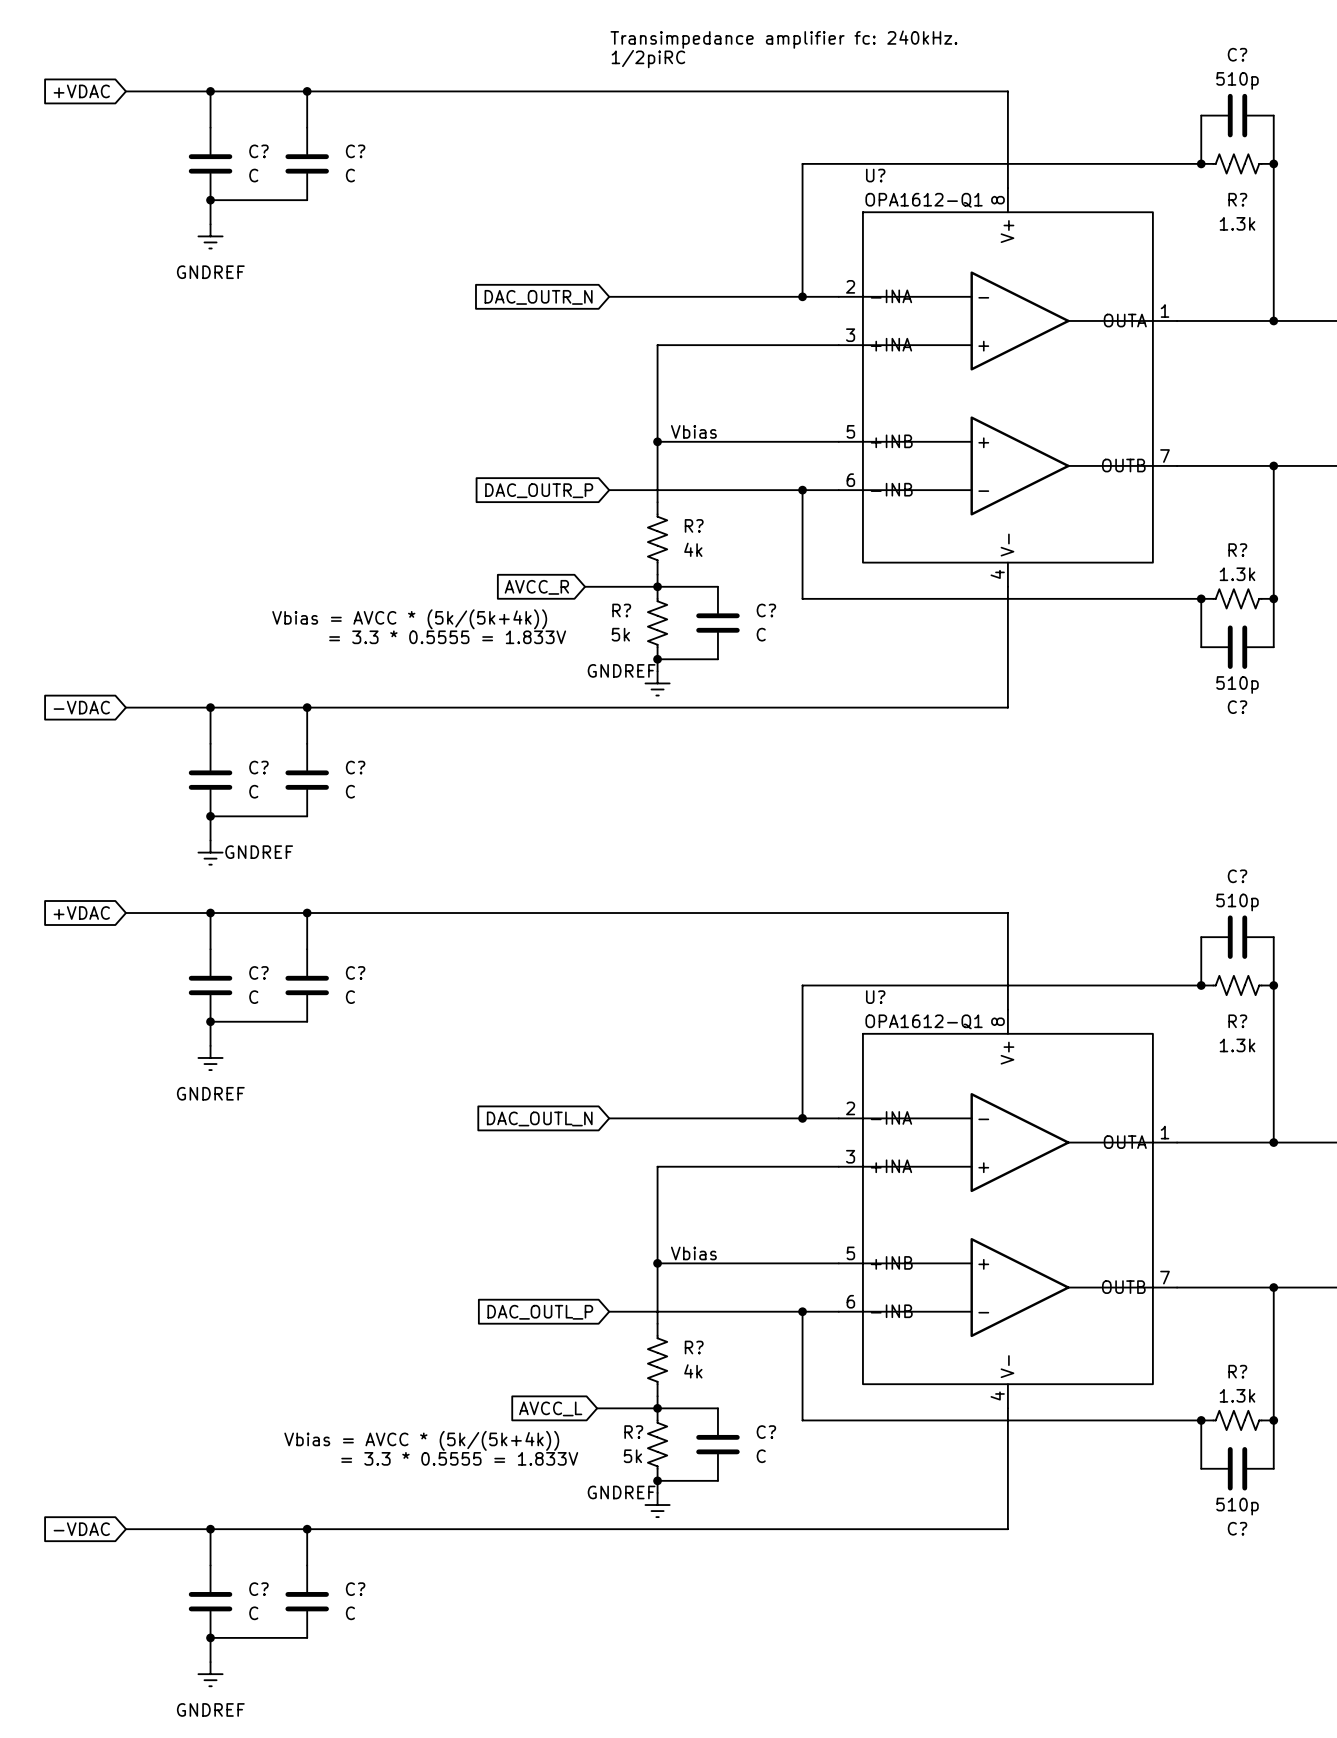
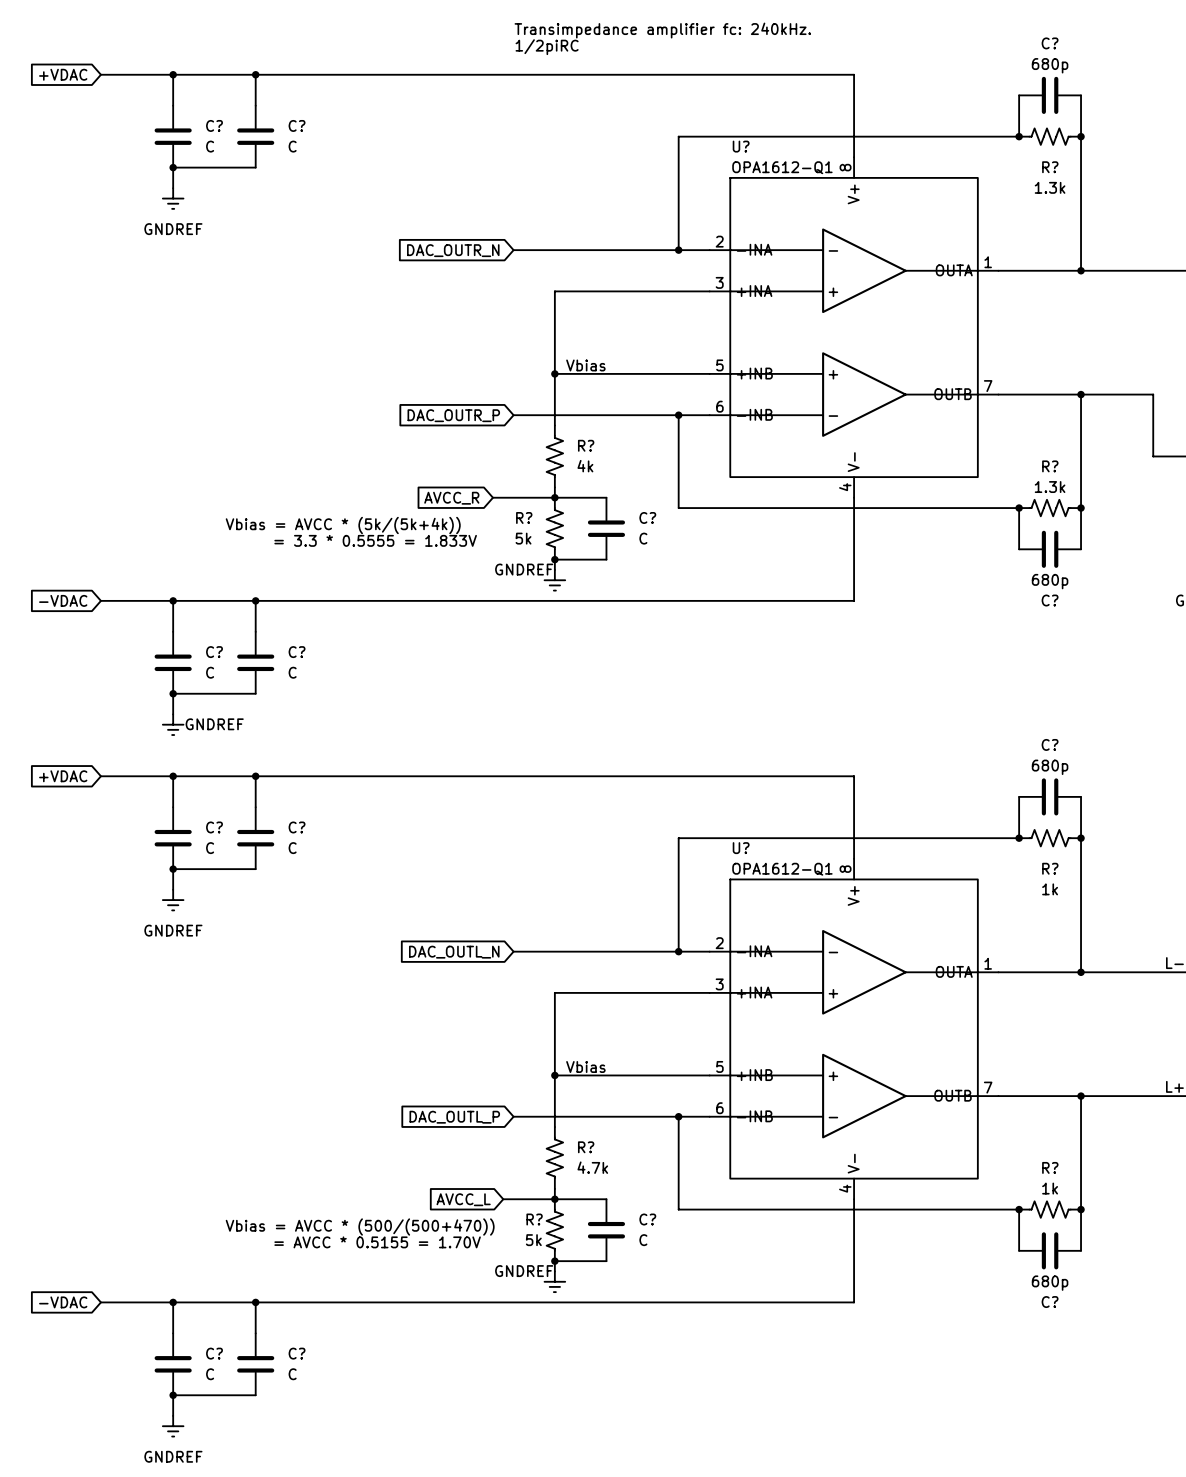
C? value: 510p (1237, 80) -> 680p (1050, 65)
C? value: 510p (1237, 685) -> 680p (1050, 581)
C? value: 510p (1237, 902) -> 680p (1050, 767)
R? value: 1.3k (1237, 1045) -> 1k (1050, 889)
R? value: 4k (693, 1371) -> 4.7k (592, 1167)
R? value: 1.3k (1237, 1395) -> 1k (1050, 1188)
text: Vbias = AVCC * (5k/(5k+4k)) (421, 1440) -> Vbias = AVCC * (500/(500+470)) (360, 1227)
text: = 3.3 * 0.5555 = 1.833V (459, 1458) -> = AVCC * 0.5155 = 1.70V (377, 1242)
C? value: 510p (1237, 1506) -> 680p (1050, 1283)

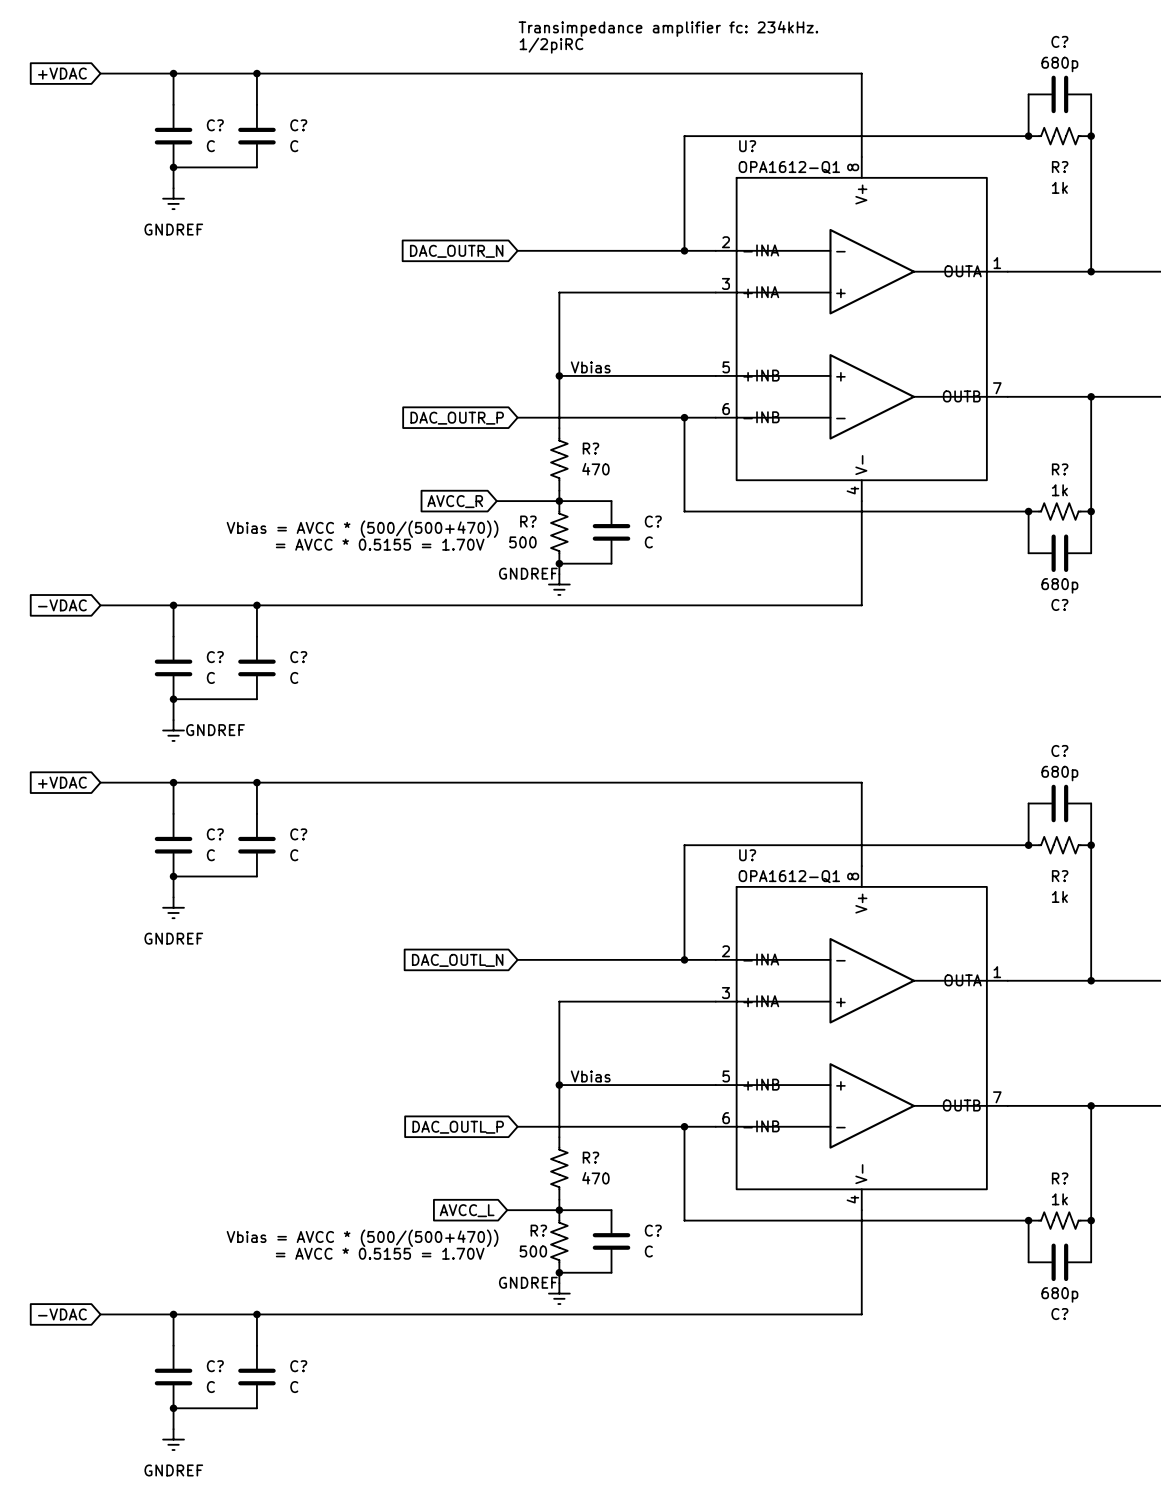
text: Transimpedance amplifier fc: 240kHz. (662, 30) -> Transimpedance amplifier fc: 234kHz. (668, 28)
R? value: 1.3k (1050, 187) -> 1k (1059, 187)
R? value: 4k (585, 466) -> 470 (595, 469)
R? value: 1.3k (1050, 487) -> 1k (1059, 490)
text: Vbias = AVCC * (5k/(5k+4k)) (343, 525) -> Vbias = AVCC * (500/(500+470)) (362, 529)
R? value: 5k (523, 538) -> 500 (522, 542)
text: = 3.3 * 0.5555 = 1.833V (375, 540) -> = AVCC * 0.5155 = 1.70V (380, 544)
R? value: 4.7k (592, 1167) -> 470 (595, 1178)
R? value: 5k (533, 1240) -> 500 (533, 1251)

